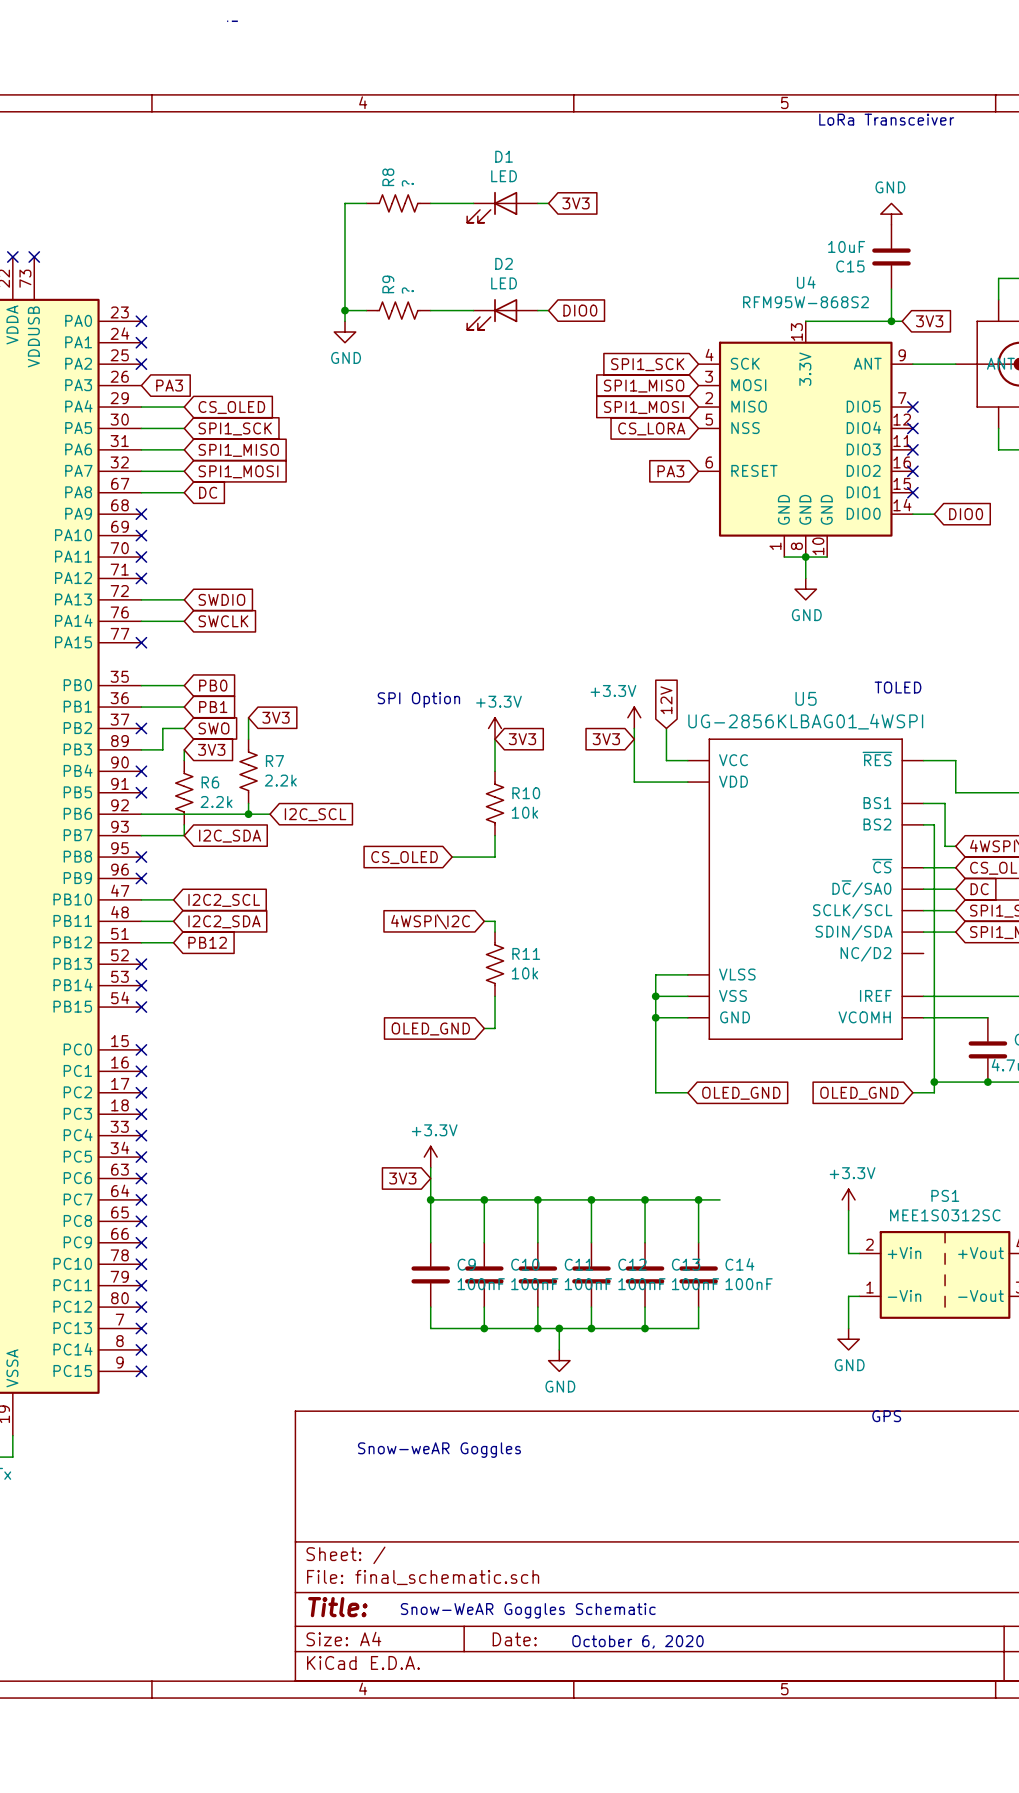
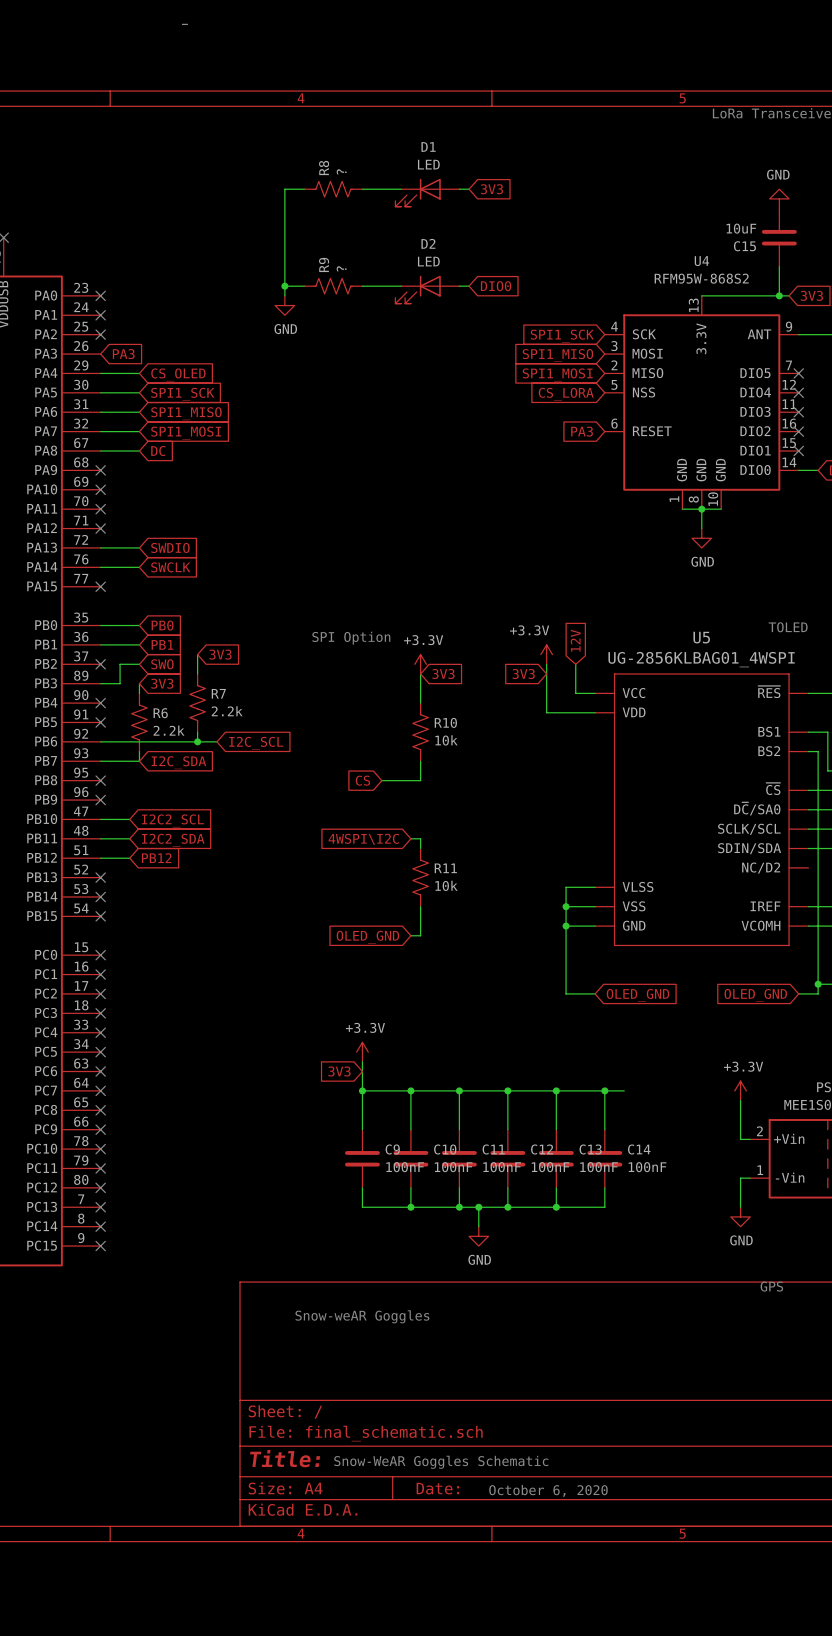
global label: CS_OLED (404, 857) -> CS (362, 780)

